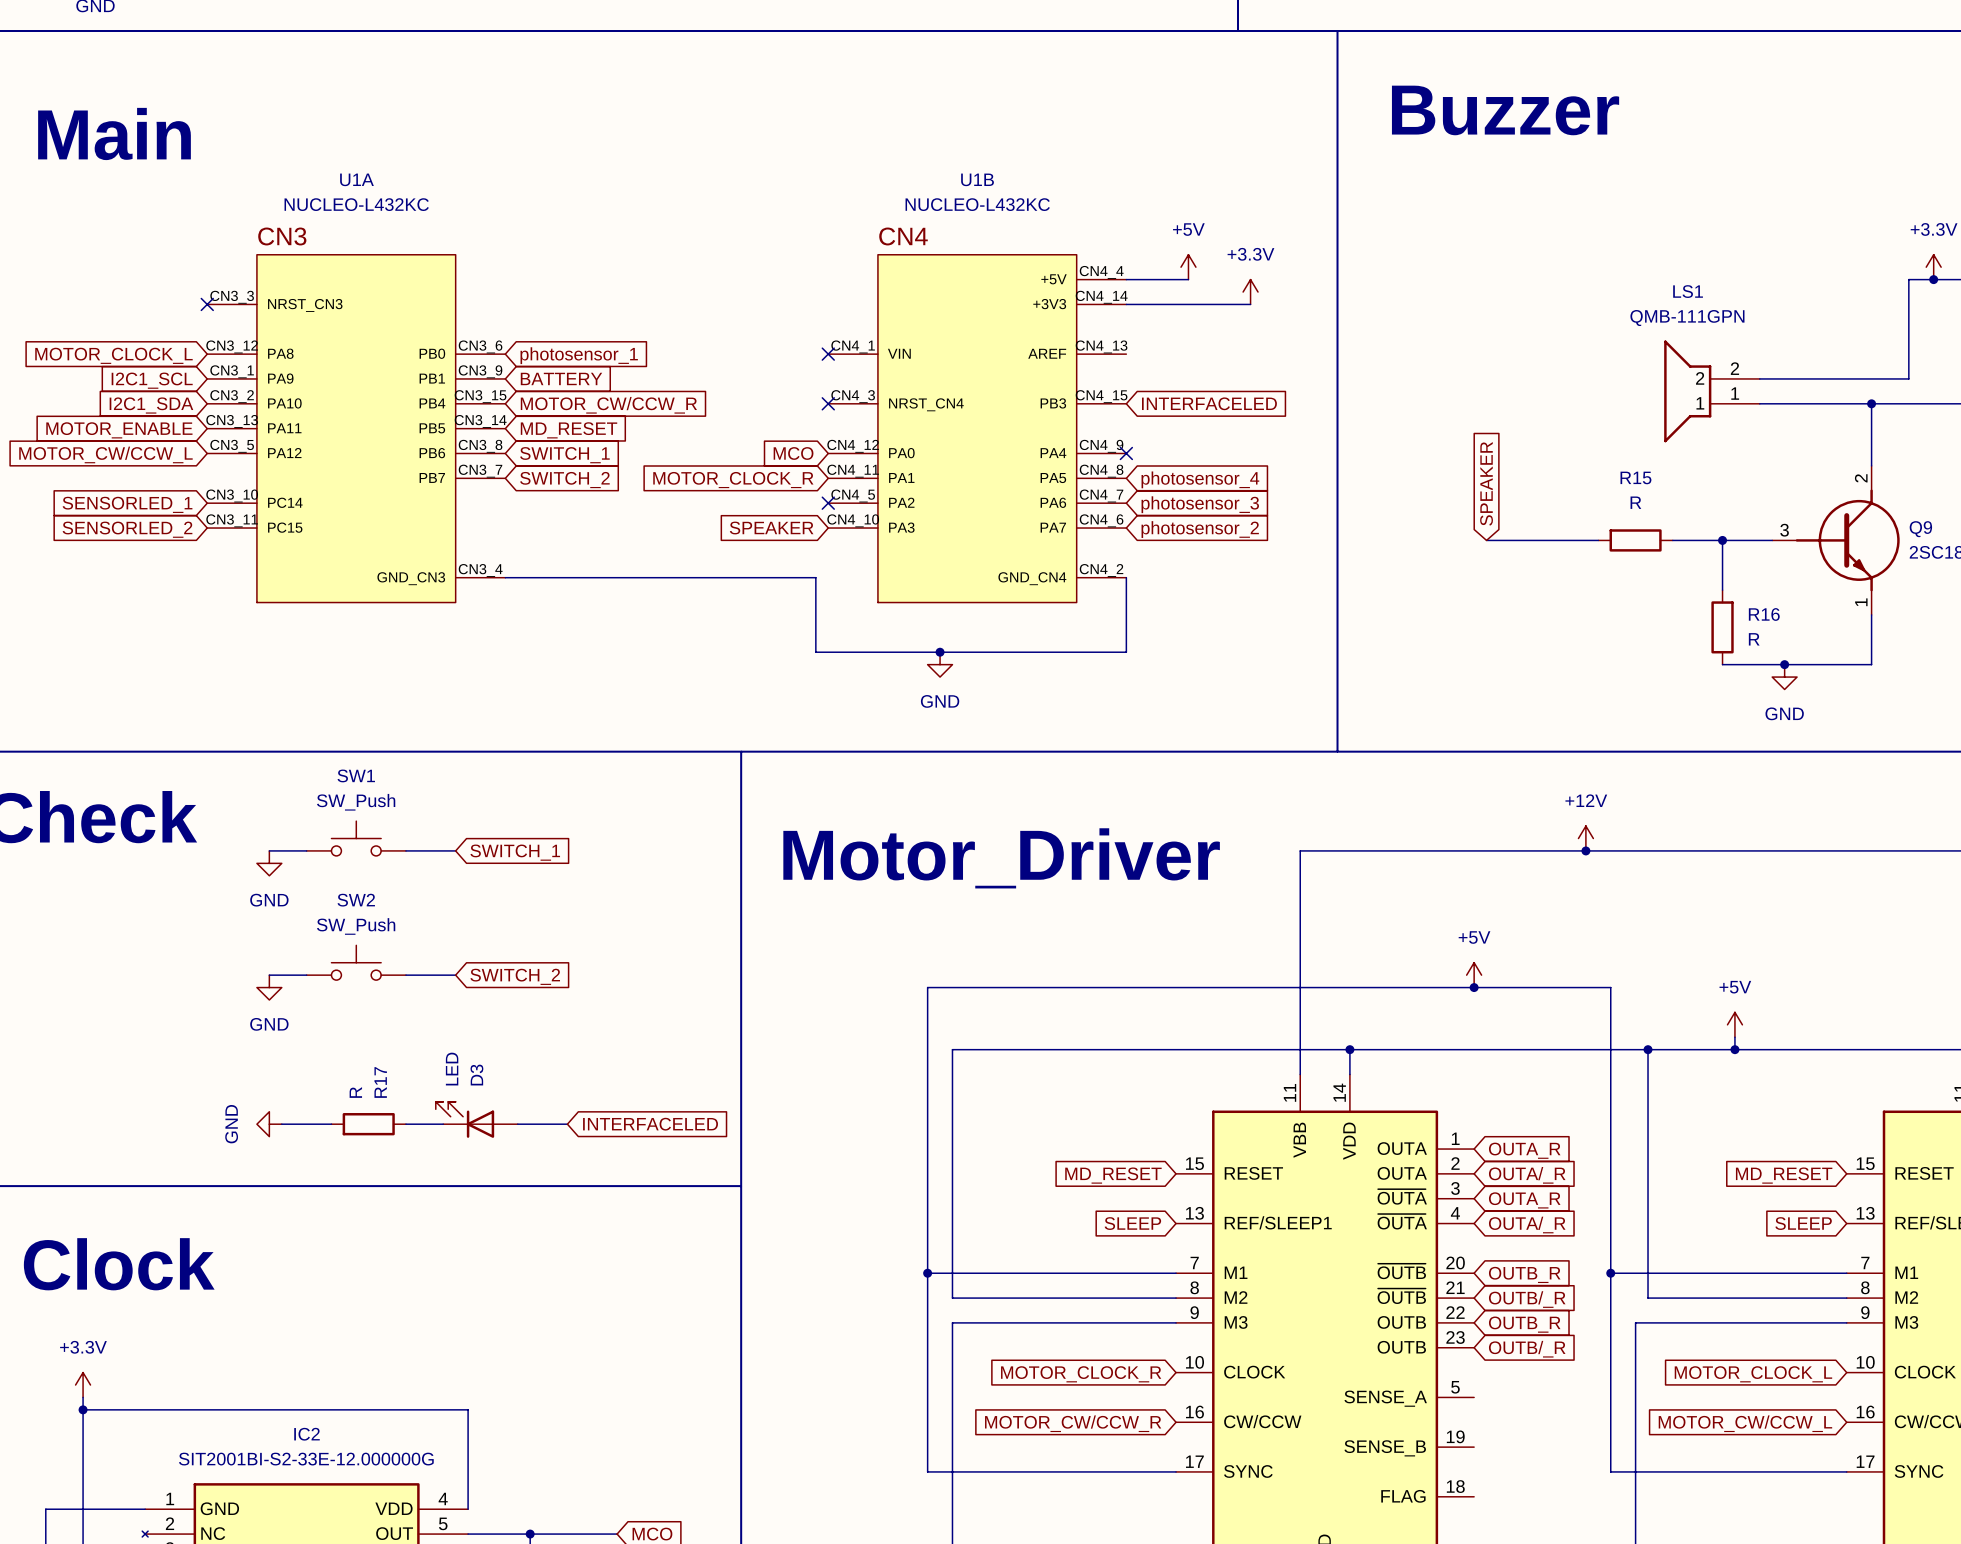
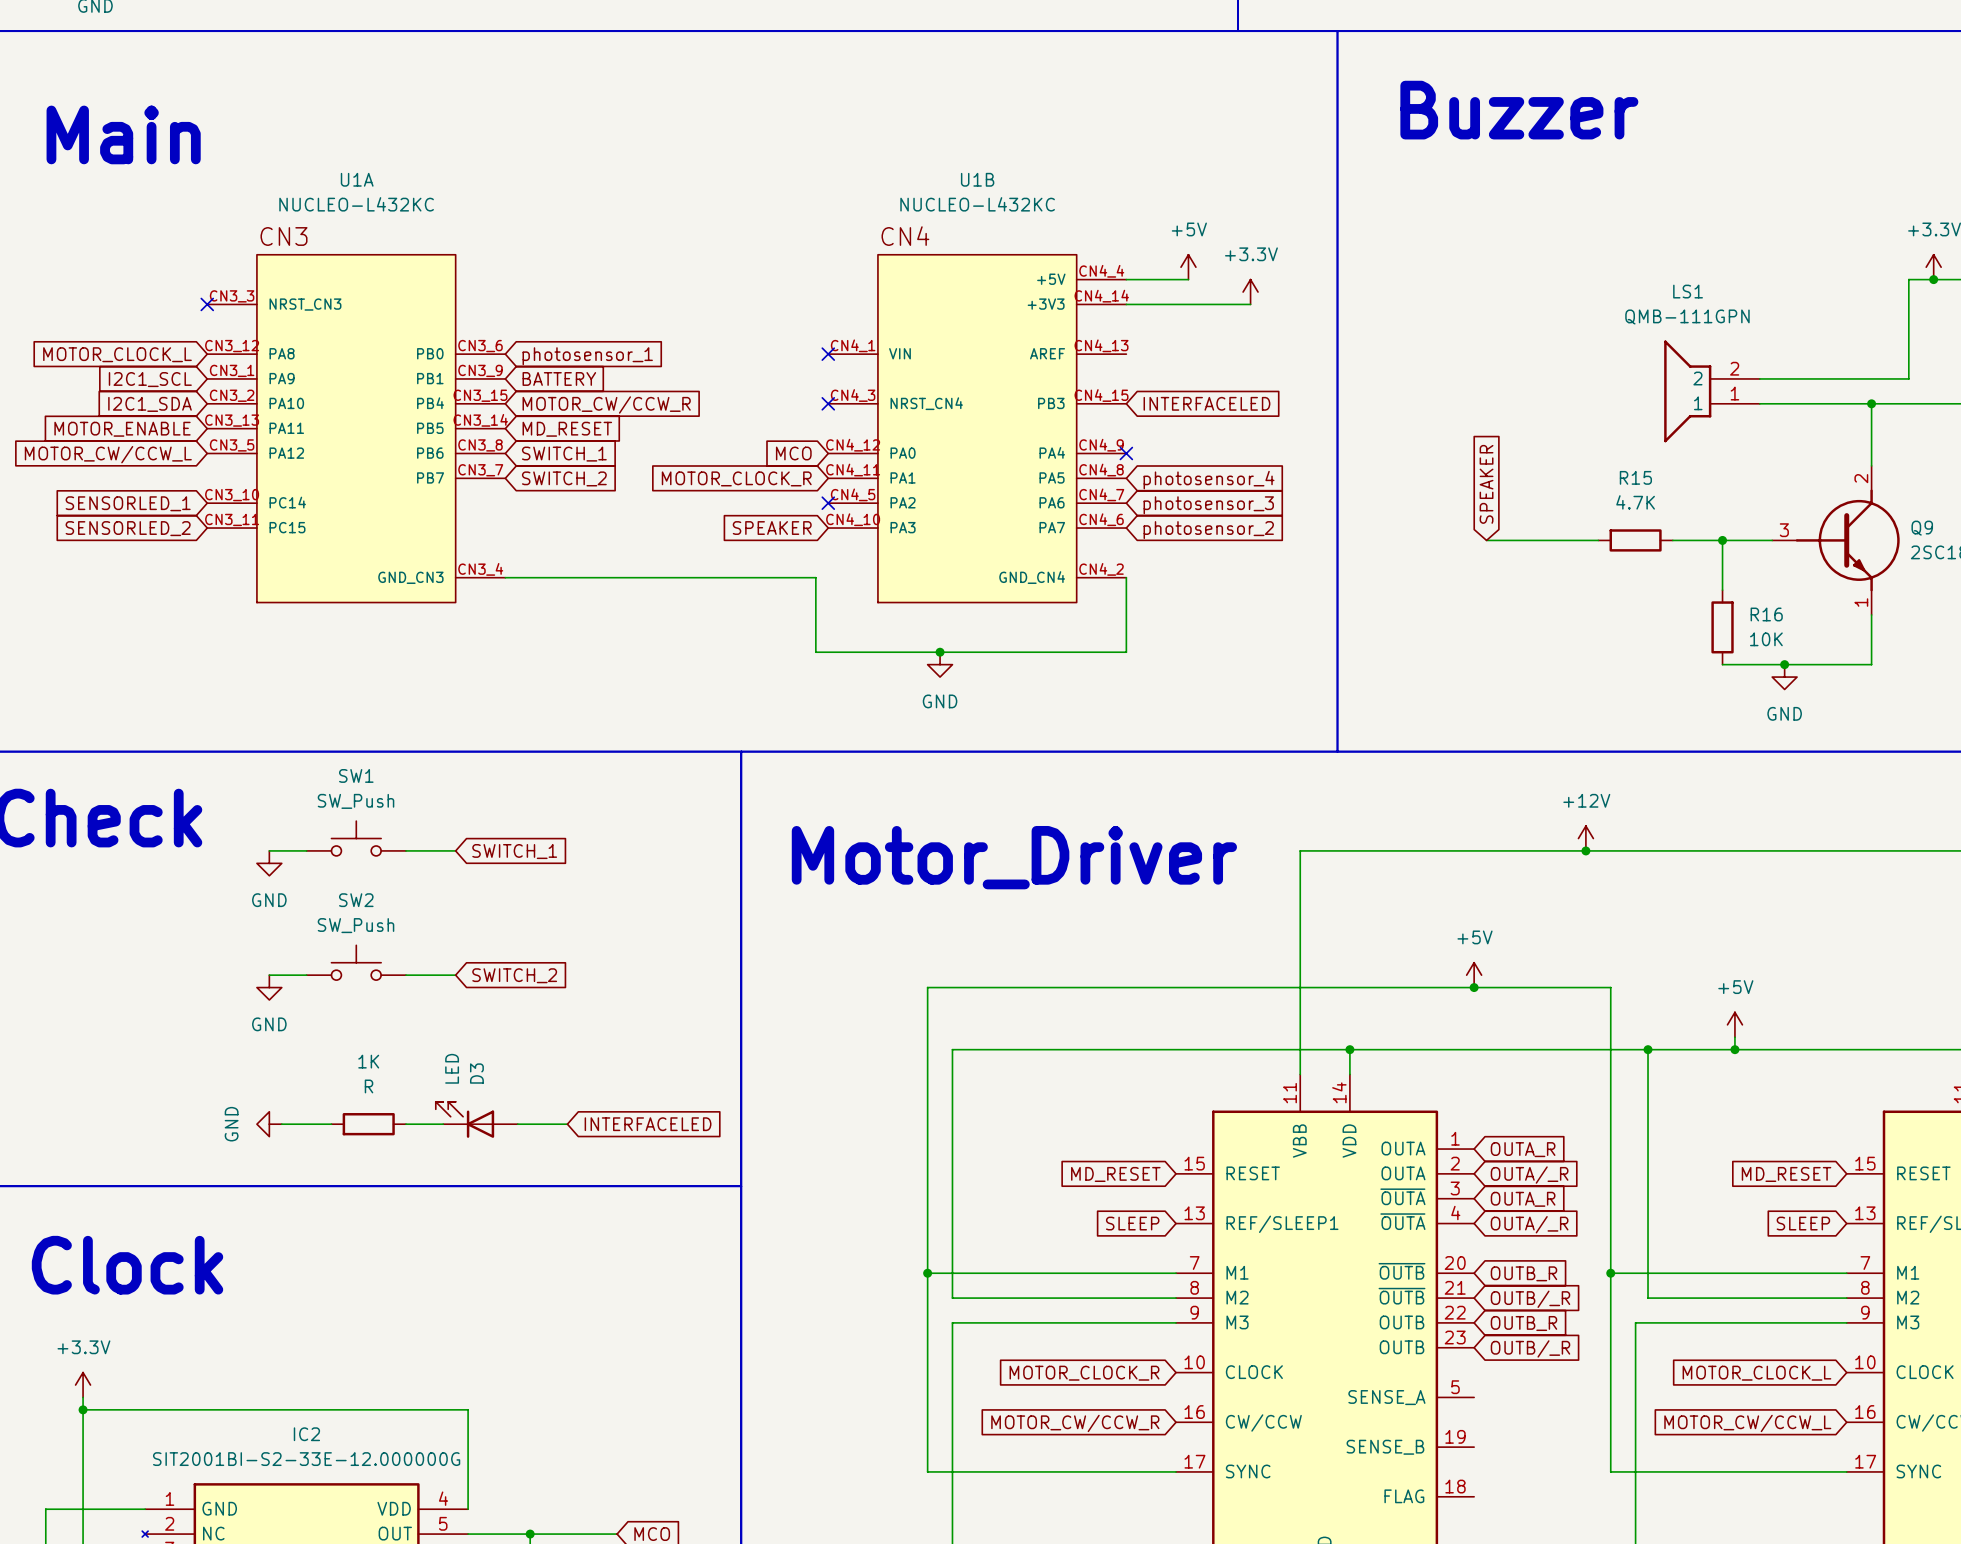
R15 value: R (1635, 502) -> 4.7K (1635, 502)
R16 value: R (1754, 639) -> 10K (1766, 639)
R17 name: R17 (380, 1082) -> 1K (368, 1061)
R17 value rotation: 0° (355, 1092) -> 90° clockwise (369, 1086)

